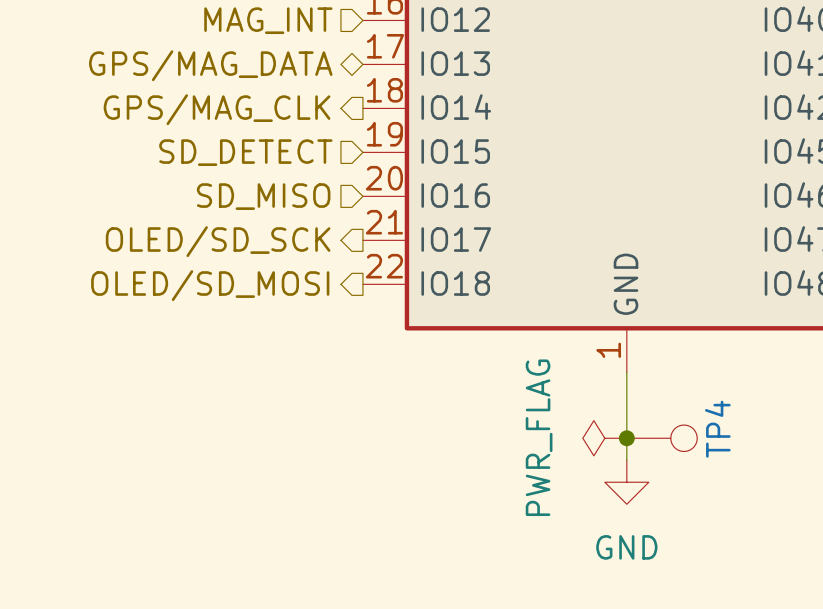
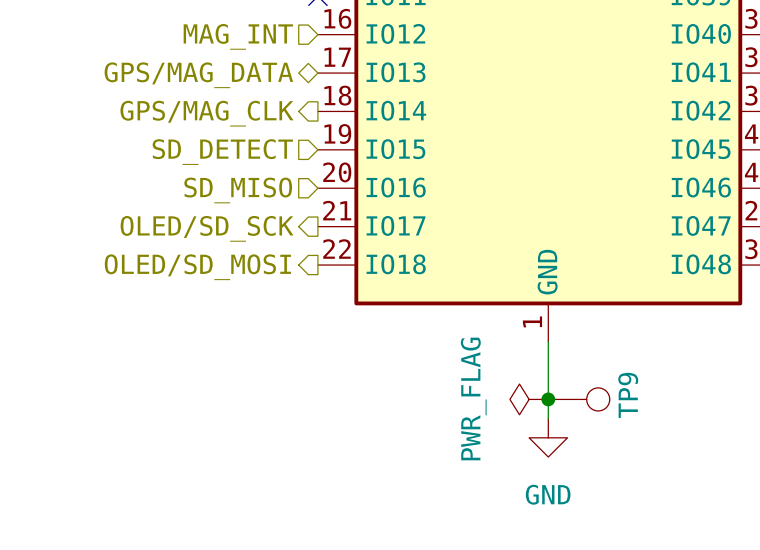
TP4 name: TP4 (717, 429) -> TP9 (628, 395)

